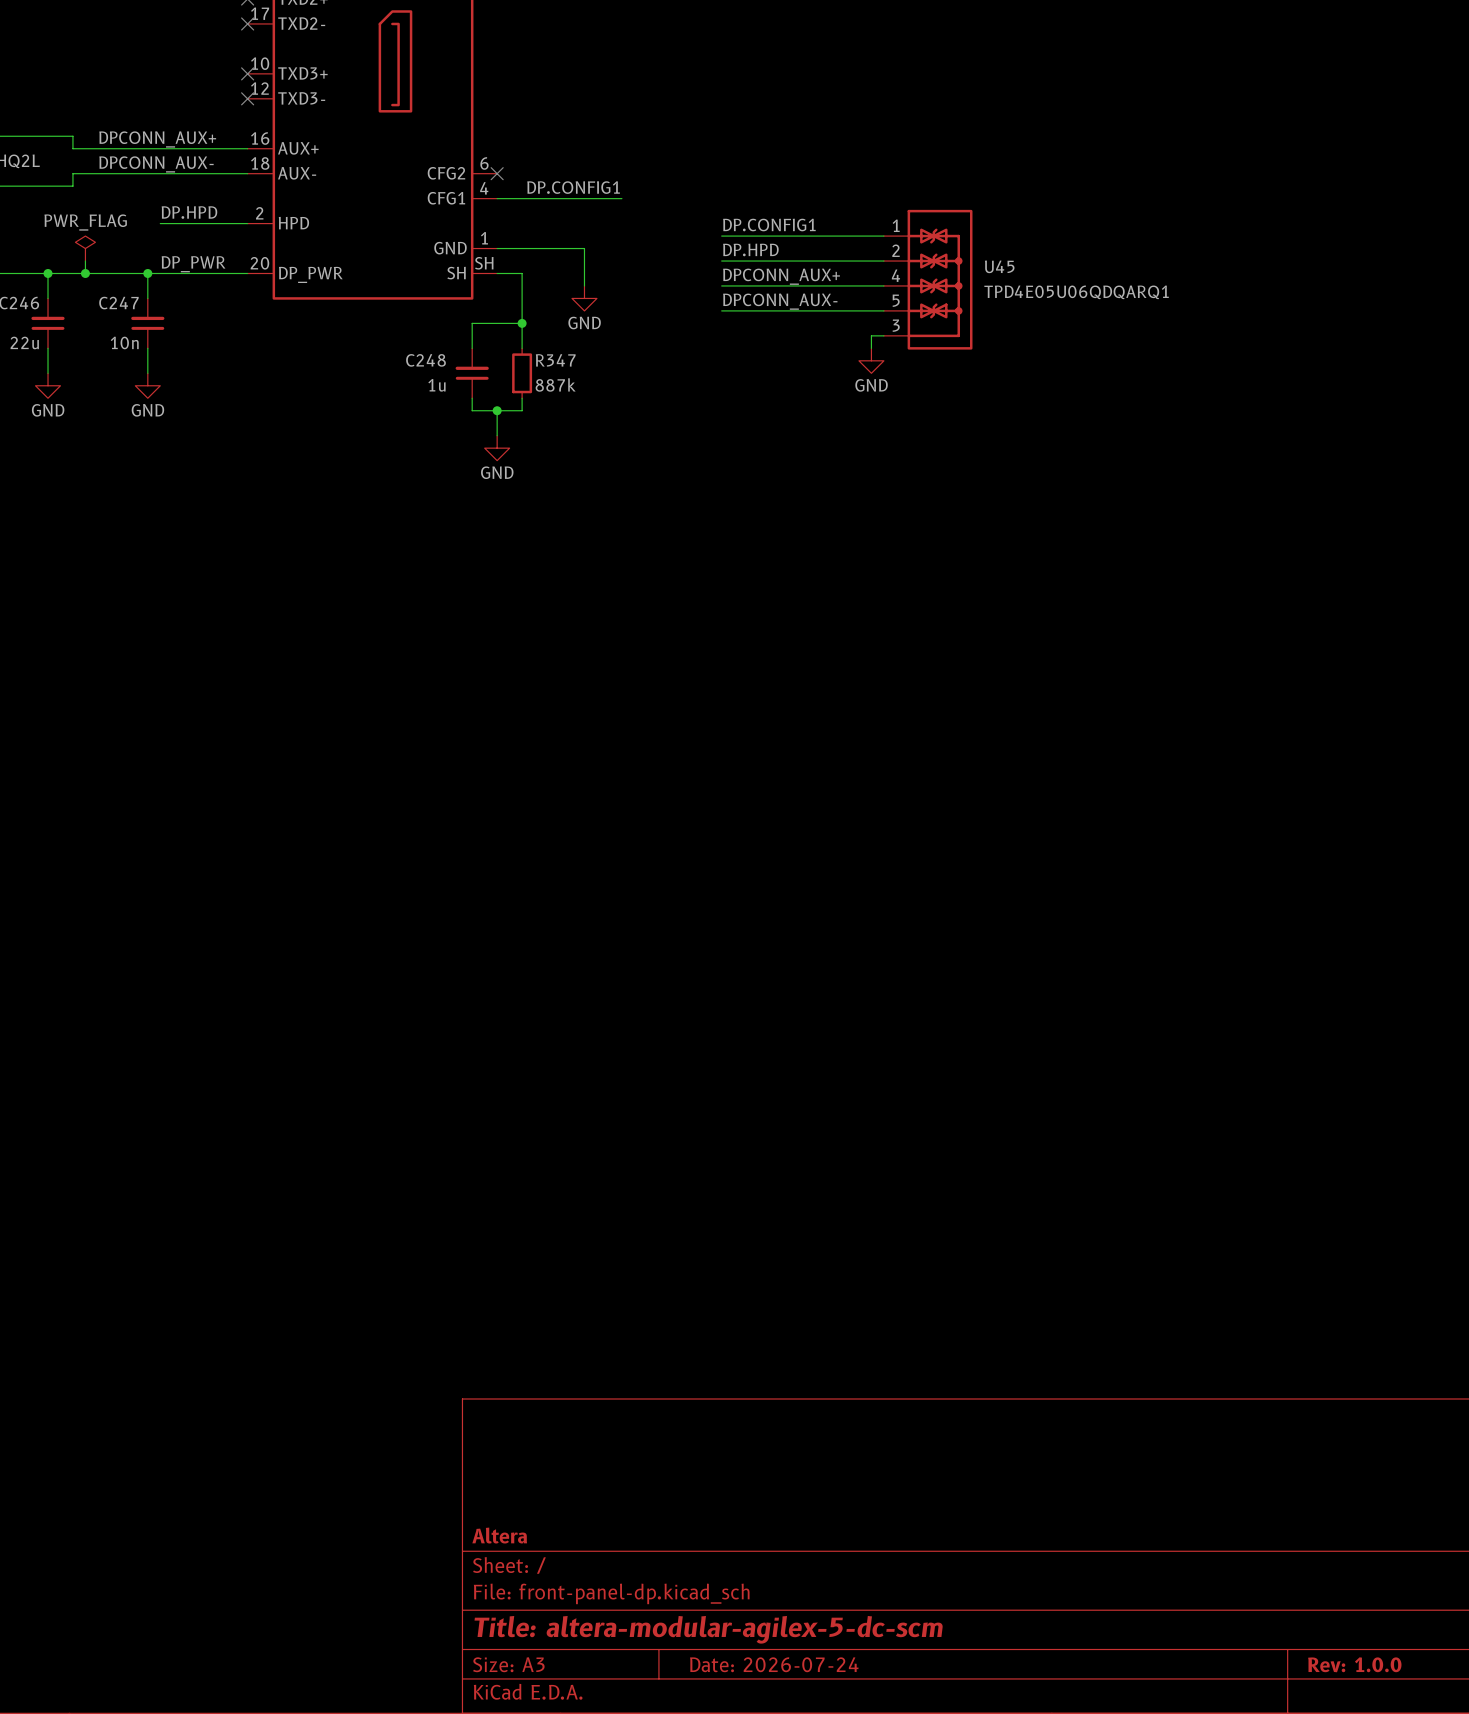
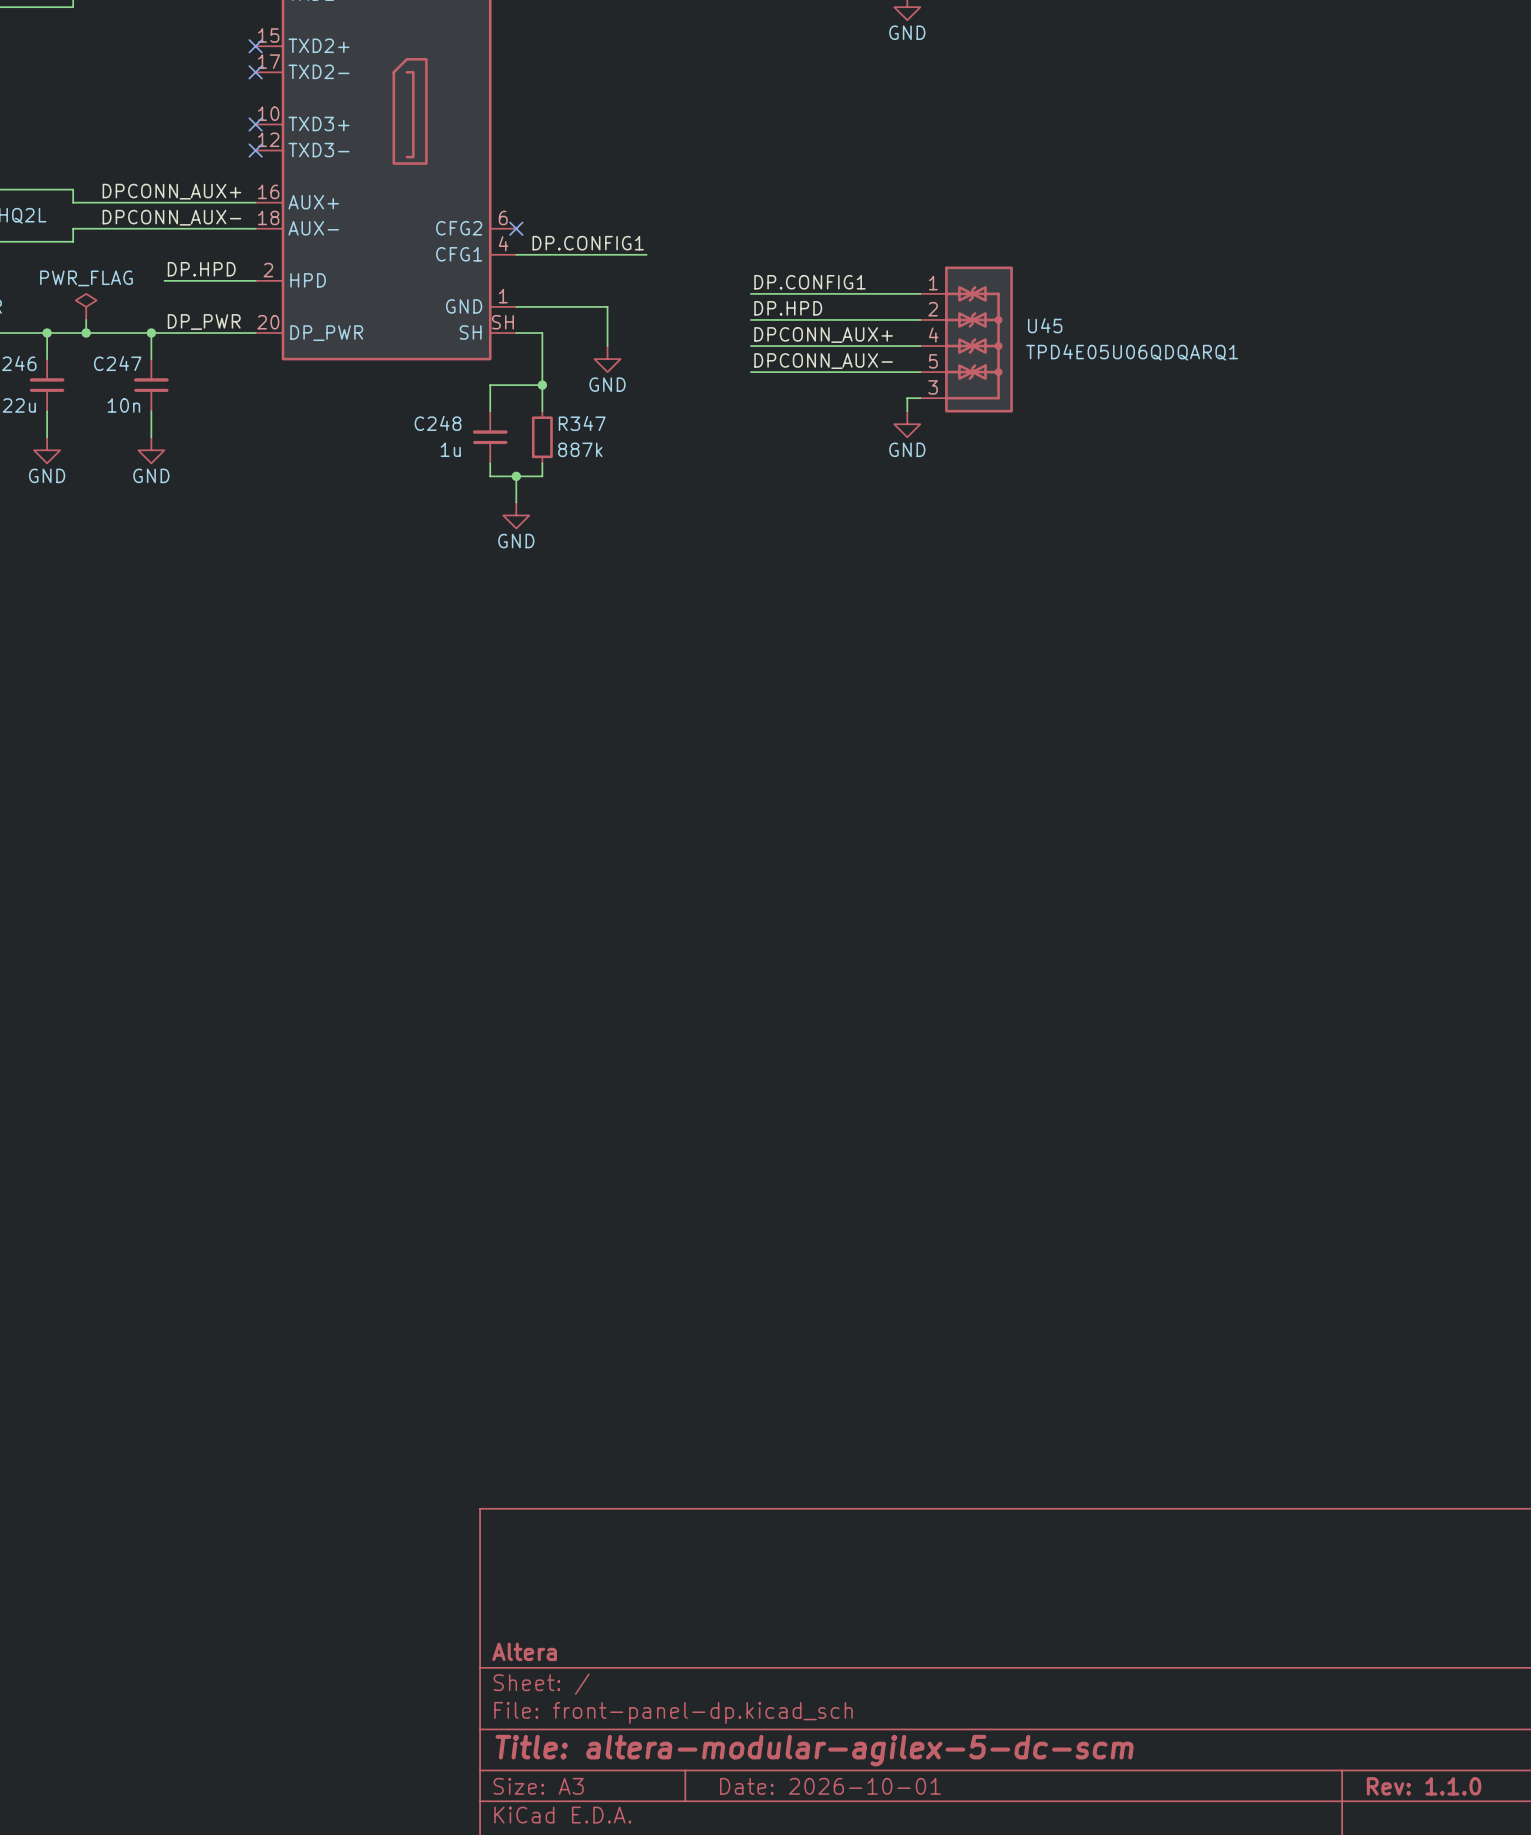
title block: Date: 2026-07-24 (774, 1664) -> Date: 2026-10-01 (830, 1786)
title block: Rev: 1.0.0 (1354, 1664) -> Rev: 1.1.0 (1424, 1786)

